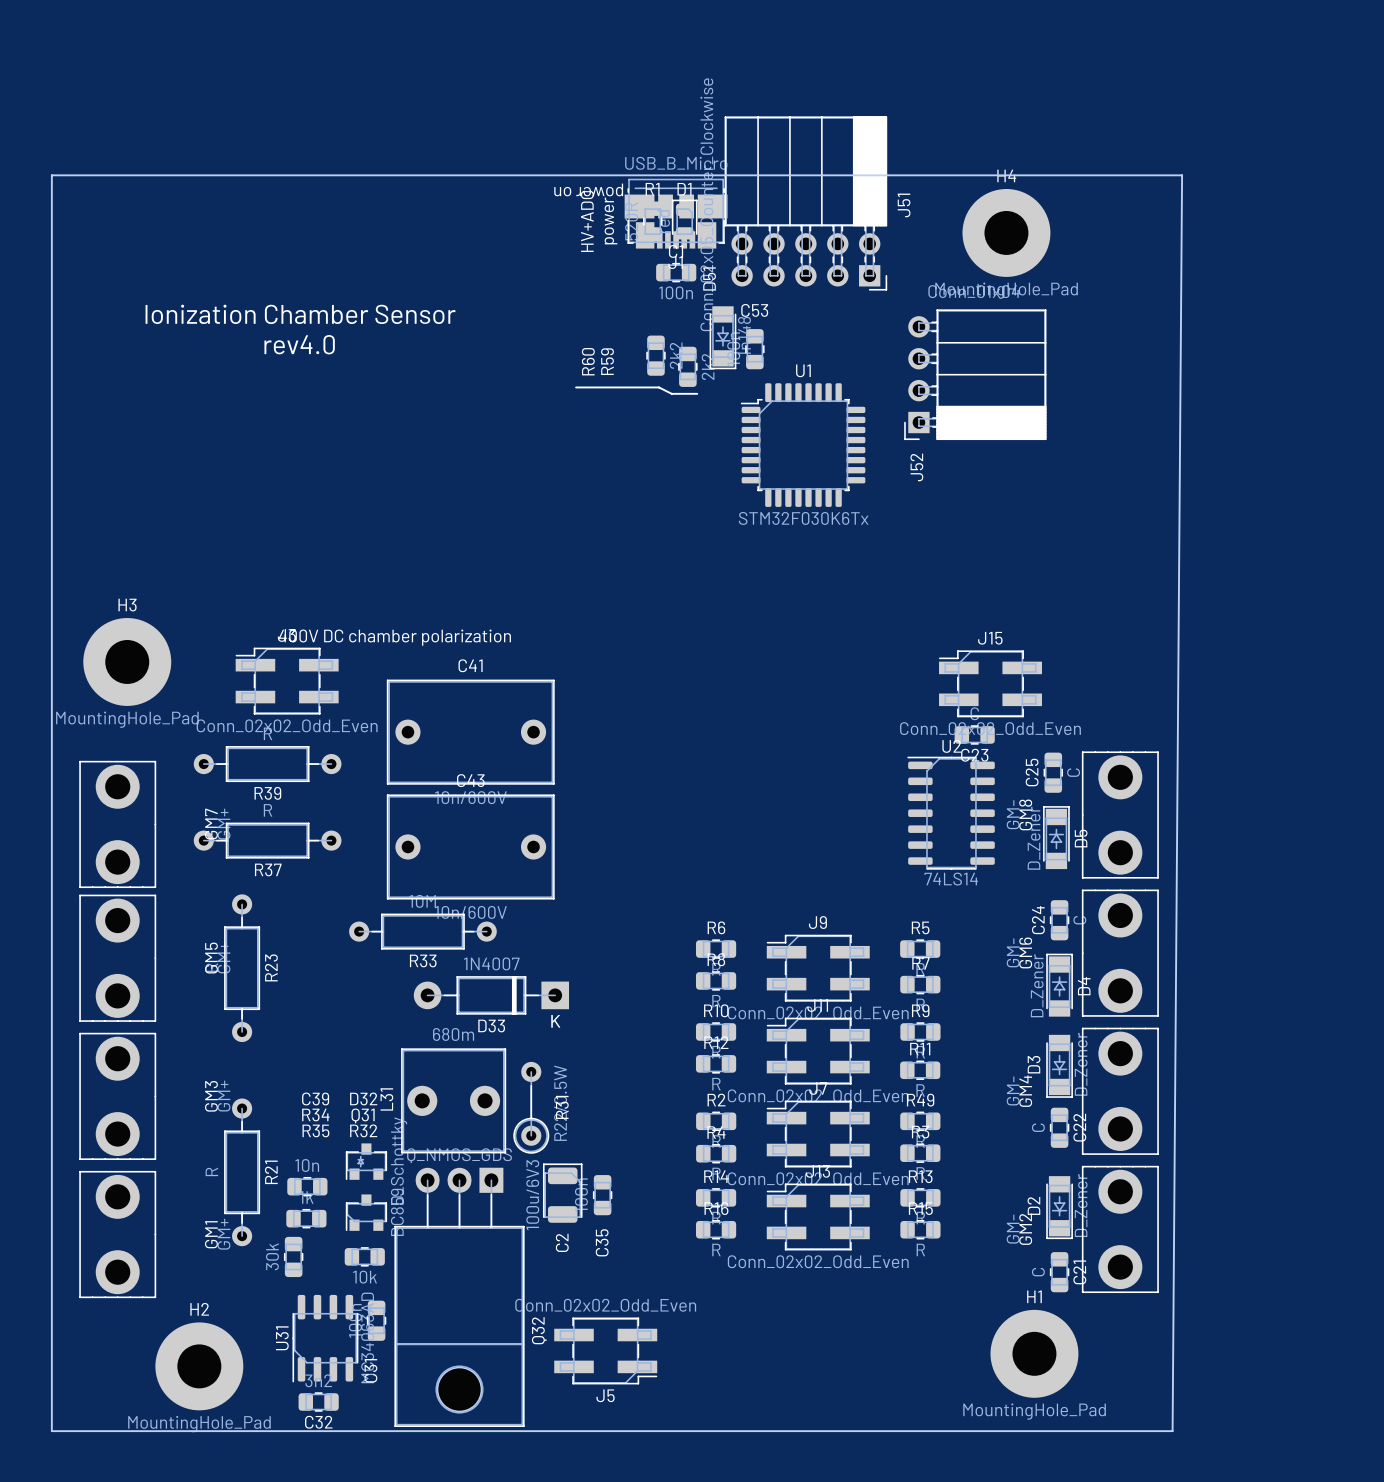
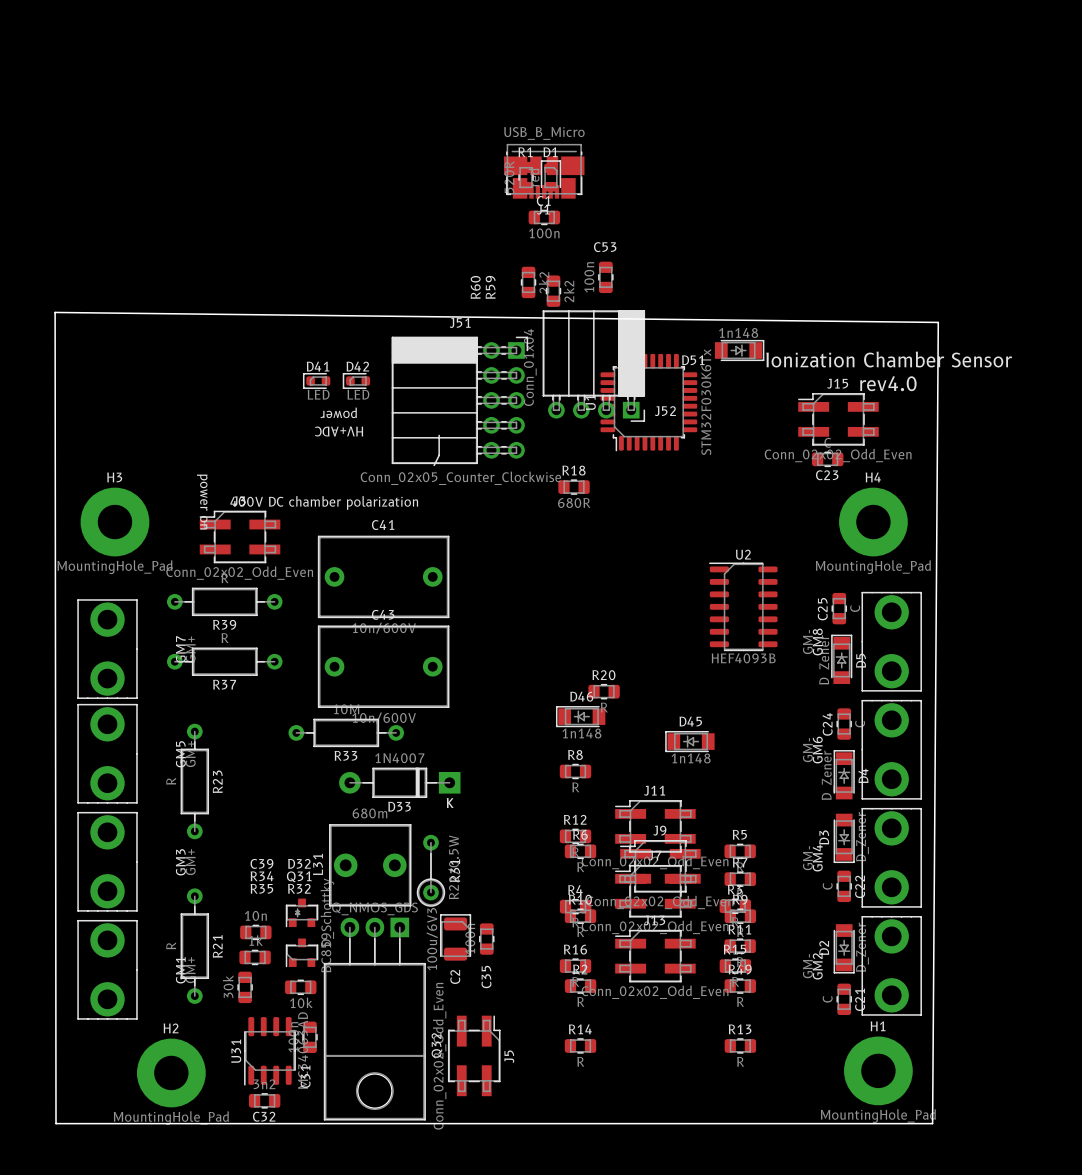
text: power on (588, 189) -> none
J51 rotation: 0° (805, 203) -> 90° counterclockwise (459, 400)
J51 position: (805, 203) -> (459, 400)
text: power (611, 220) -> none
text: HV+ADC (587, 221) -> none
H4 position: (1006, 232) -> (873, 522)
text: Ionization Chamber Sensor (300, 314) -> none
D51 rotation: 0° (722, 337) -> 90° counterclockwise (739, 350)
D51 position: (722, 337) -> (739, 350)
text: rev4.0 (299, 344) -> none
J52 rotation: 0° (975, 374) -> 90° counterclockwise (593, 366)
J52 position: (975, 374) -> (593, 366)
line: (576, 387) (658, 387) (671, 393) (697, 393) -> none
U1 rotation: 0° (803, 445) -> 90° counterclockwise (648, 402)
text: none -> Ionization Chamber Sensor (889, 359)
D41: none -> LED (316, 380)
D42: none -> LED (356, 380)
text: none -> rev4.0 (888, 383)
text: none -> power (338, 412)
text: none -> HV+ADC (339, 431)
line: none -> (439, 435) (439, 455) (434, 465)
R18: none -> 680R (574, 487)
text: none -> power on (202, 502)
J15 position: (990, 683) -> (838, 419)
C23 position: (974, 734) -> (827, 459)
U2 position: (951, 813) -> (743, 606)
R20: none -> R (604, 691)
U2 value: 74LS14 (951, 879) -> HEF4093B (743, 658)
D46: none -> 1n148 (580, 716)
D45: none -> 1n148 (689, 741)
R6 position: (716, 949) -> (580, 851)
R5 position: (920, 949) -> (740, 851)
R23 position: (242, 968) -> (194, 781)
J9 position: (818, 968) -> (660, 866)
R7 position: (920, 984) -> (740, 879)
R10 position: (716, 1031) -> (580, 916)
R9 position: (920, 1031) -> (740, 916)
R11 position: (920, 1070) -> (740, 946)
R2 position: (716, 1121) -> (580, 986)
R49 position: (920, 1121) -> (740, 986)
R21 position: (242, 1172) -> (194, 946)
R14 position: (716, 1197) -> (580, 1045)
R13 position: (920, 1197) -> (740, 1045)
J5 rotation: 0° (605, 1350) -> 90° counterclockwise (474, 1055)
H1 position: (1034, 1353) -> (878, 1070)
board edge: (51, 1431) (51, 175) (1182, 175) (1172, 1431) -> (56, 1123) (55, 312) (938, 322) (932, 1123)

